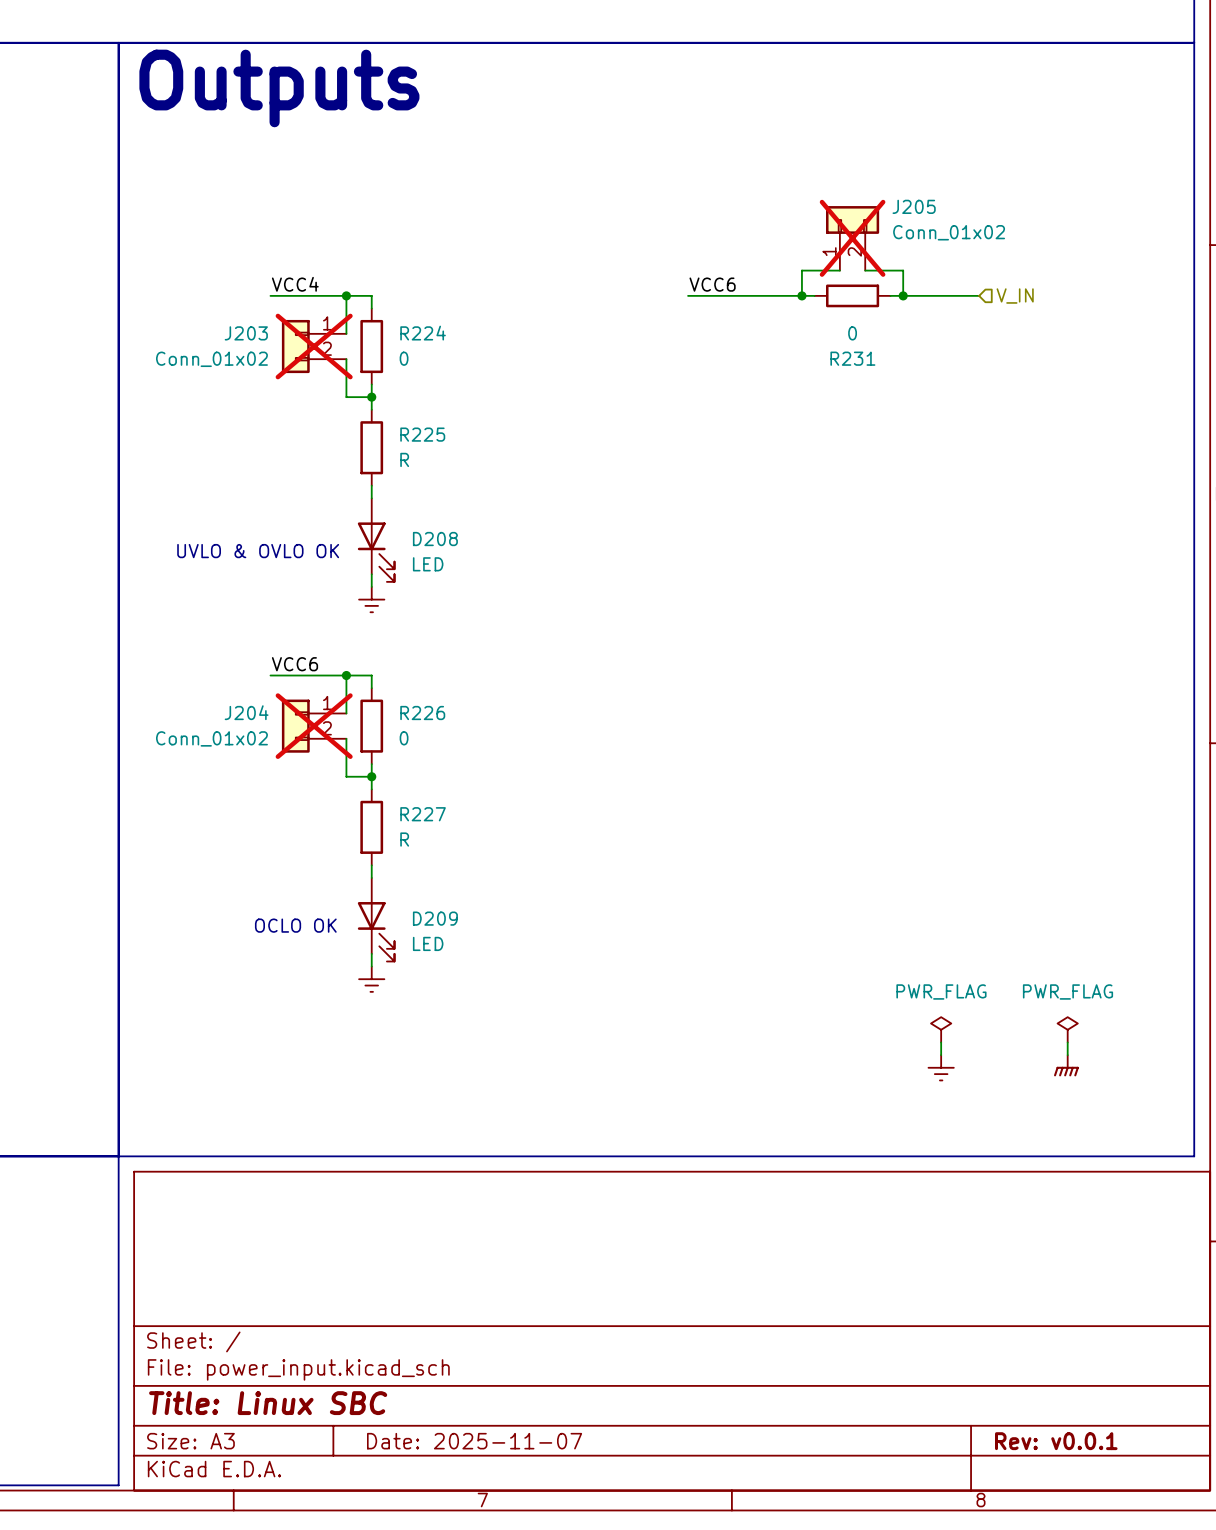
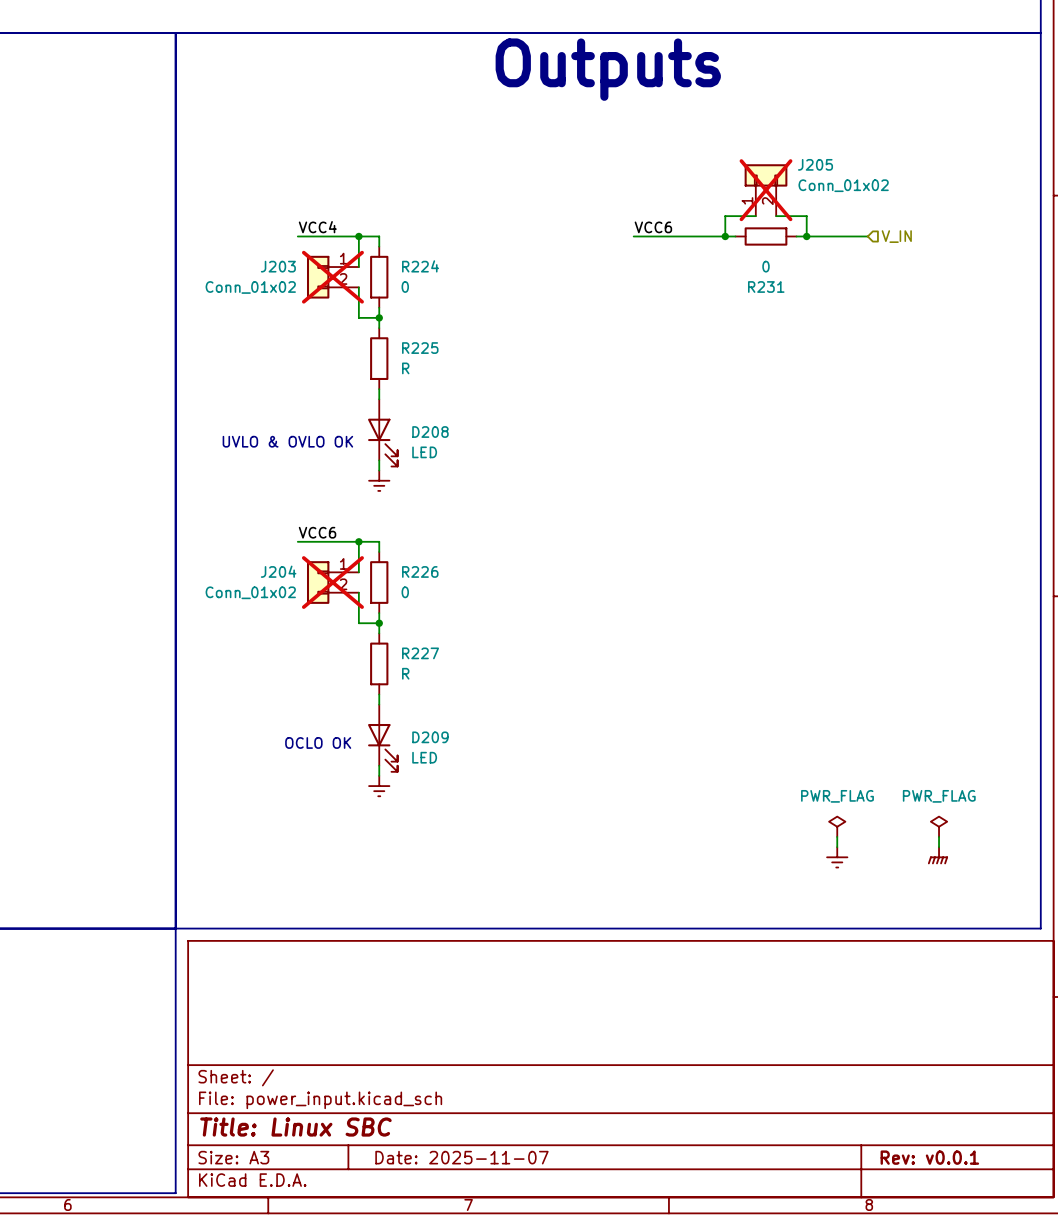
text: Outputs (279, 88) -> none
text: none -> Outputs (608, 69)

